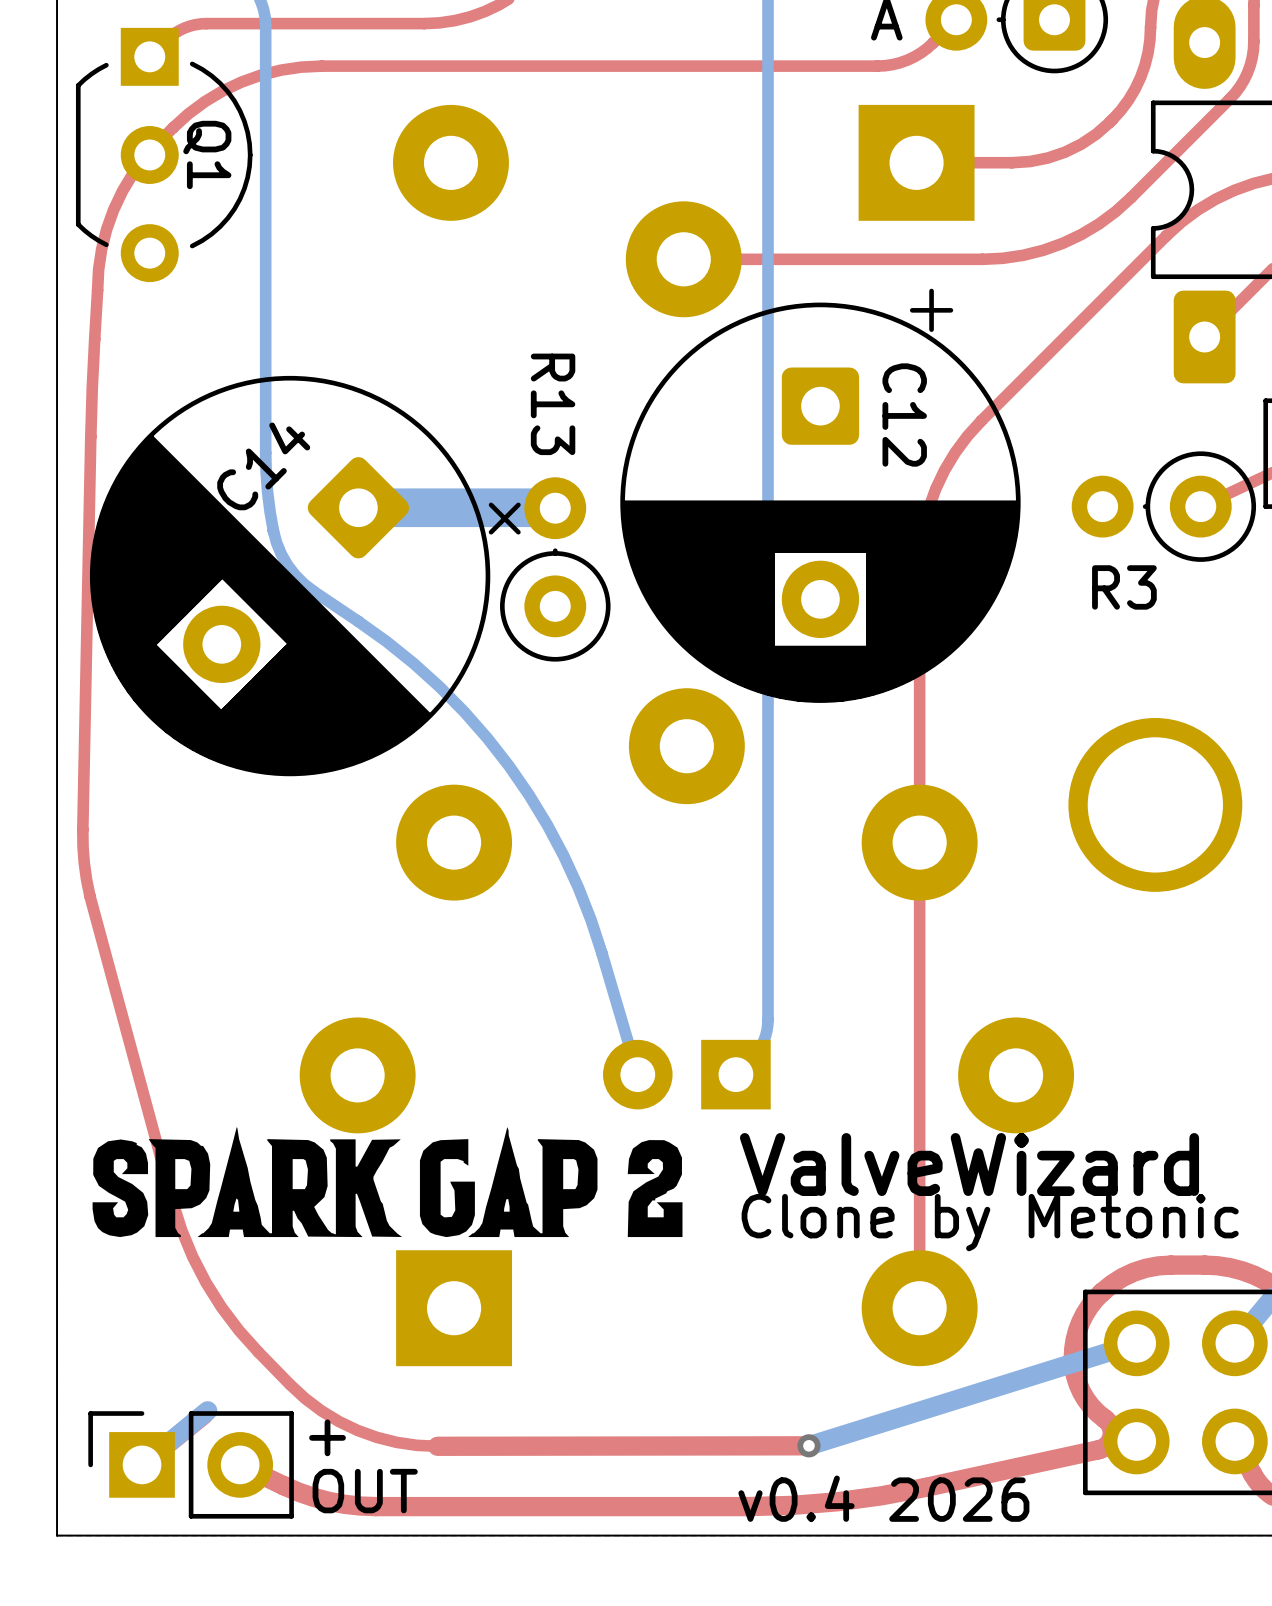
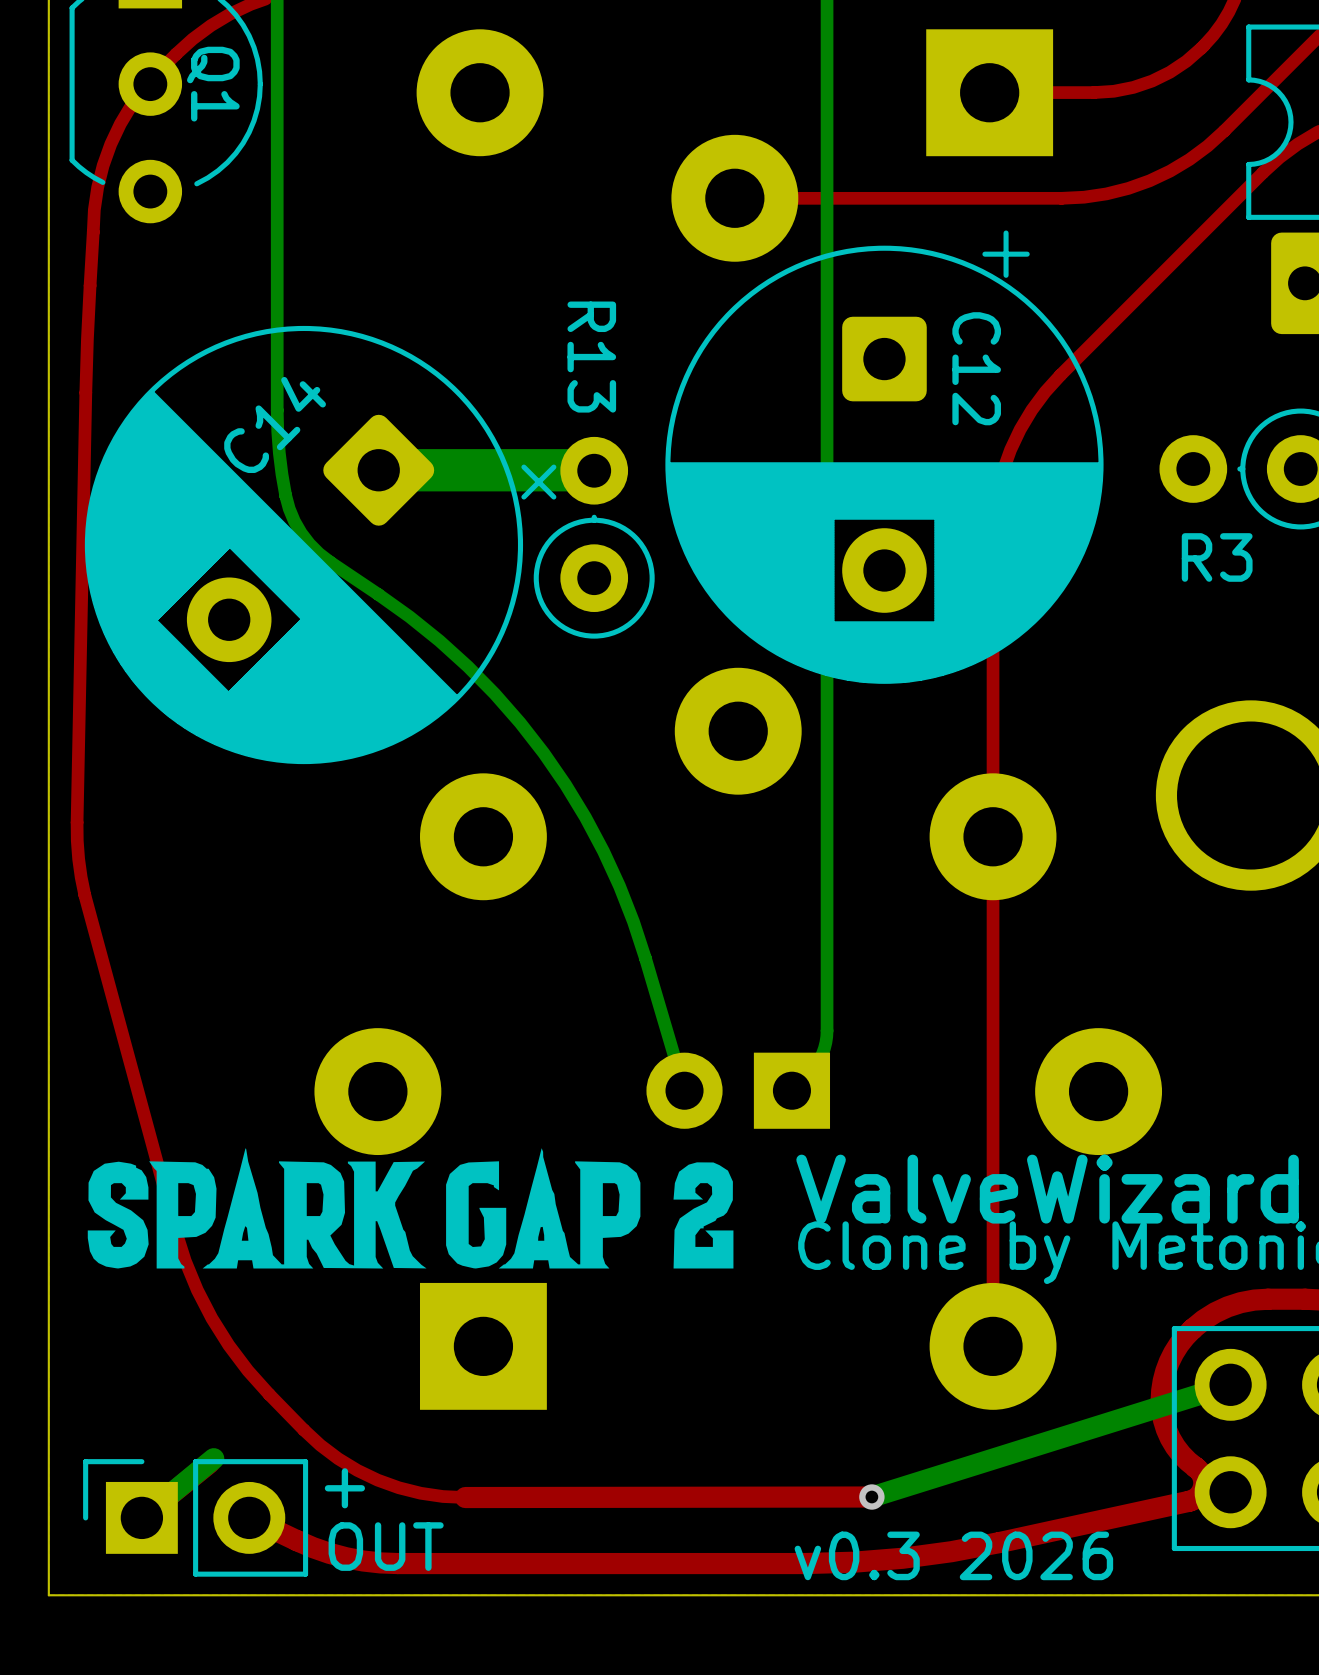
text: v0.4 2026 (883, 1498) -> v0.3 2026 (953, 1555)

